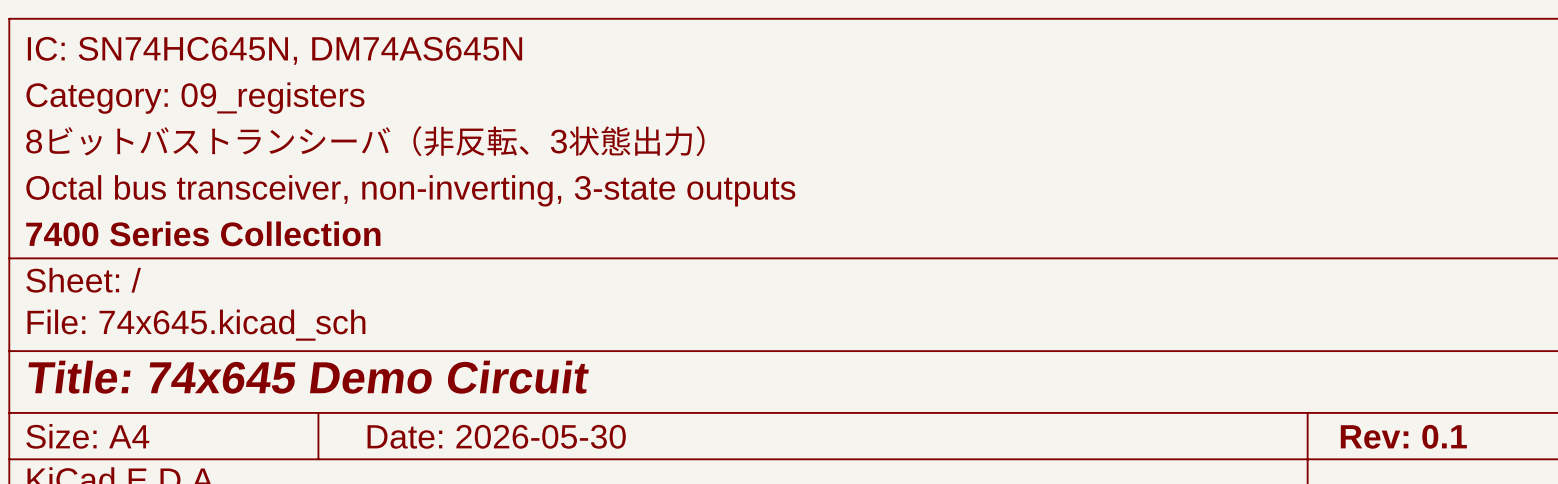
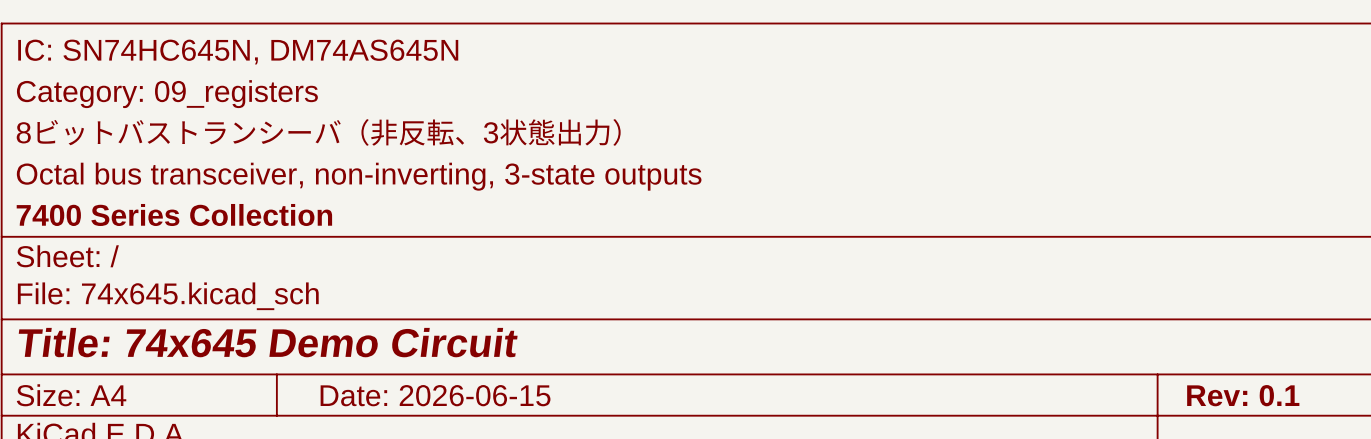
title block: Date: 2026-05-30 (496, 436) -> Date: 2026-06-15 (435, 395)

